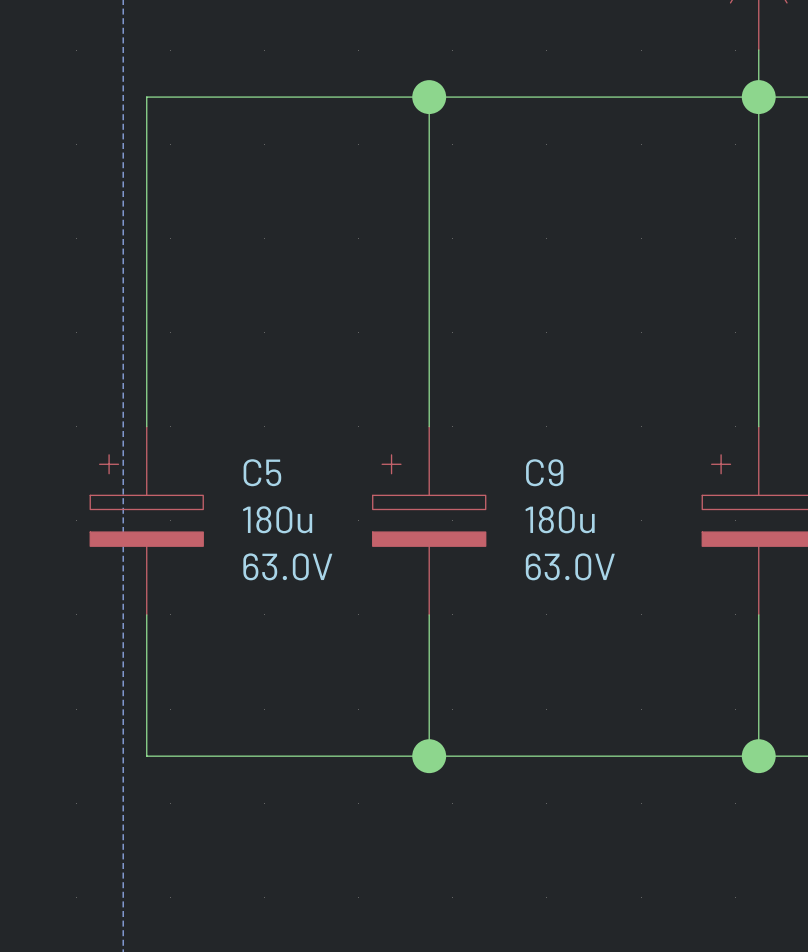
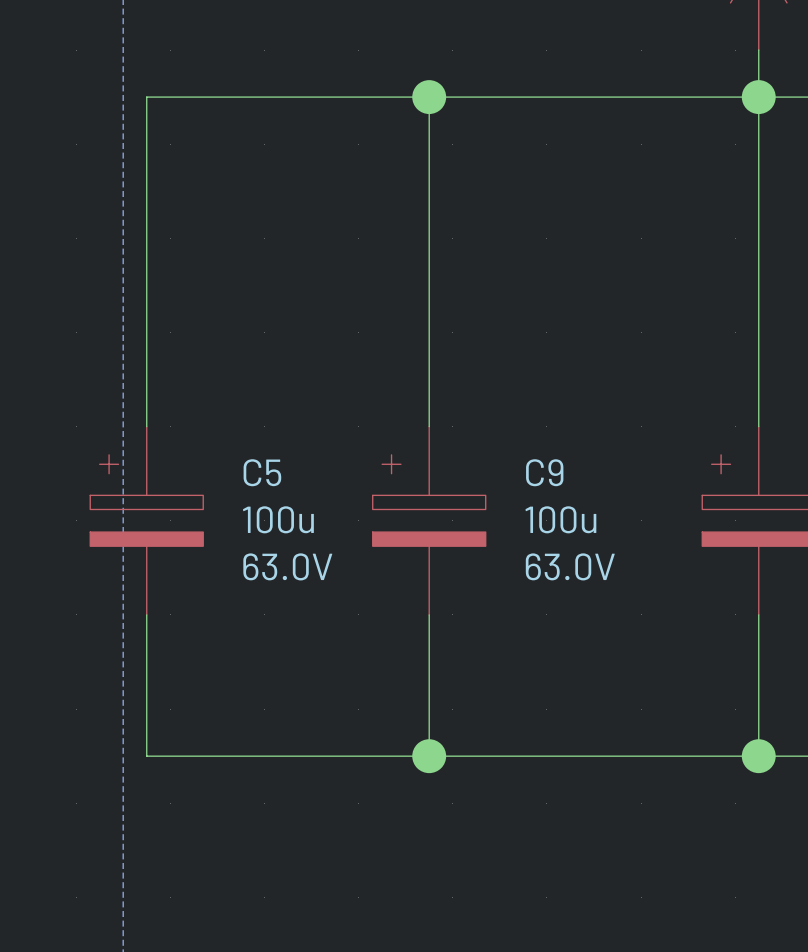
C5 value: 180u (277, 519) -> 100u (278, 519)
C9 value: 180u (560, 519) -> 100u (560, 519)

